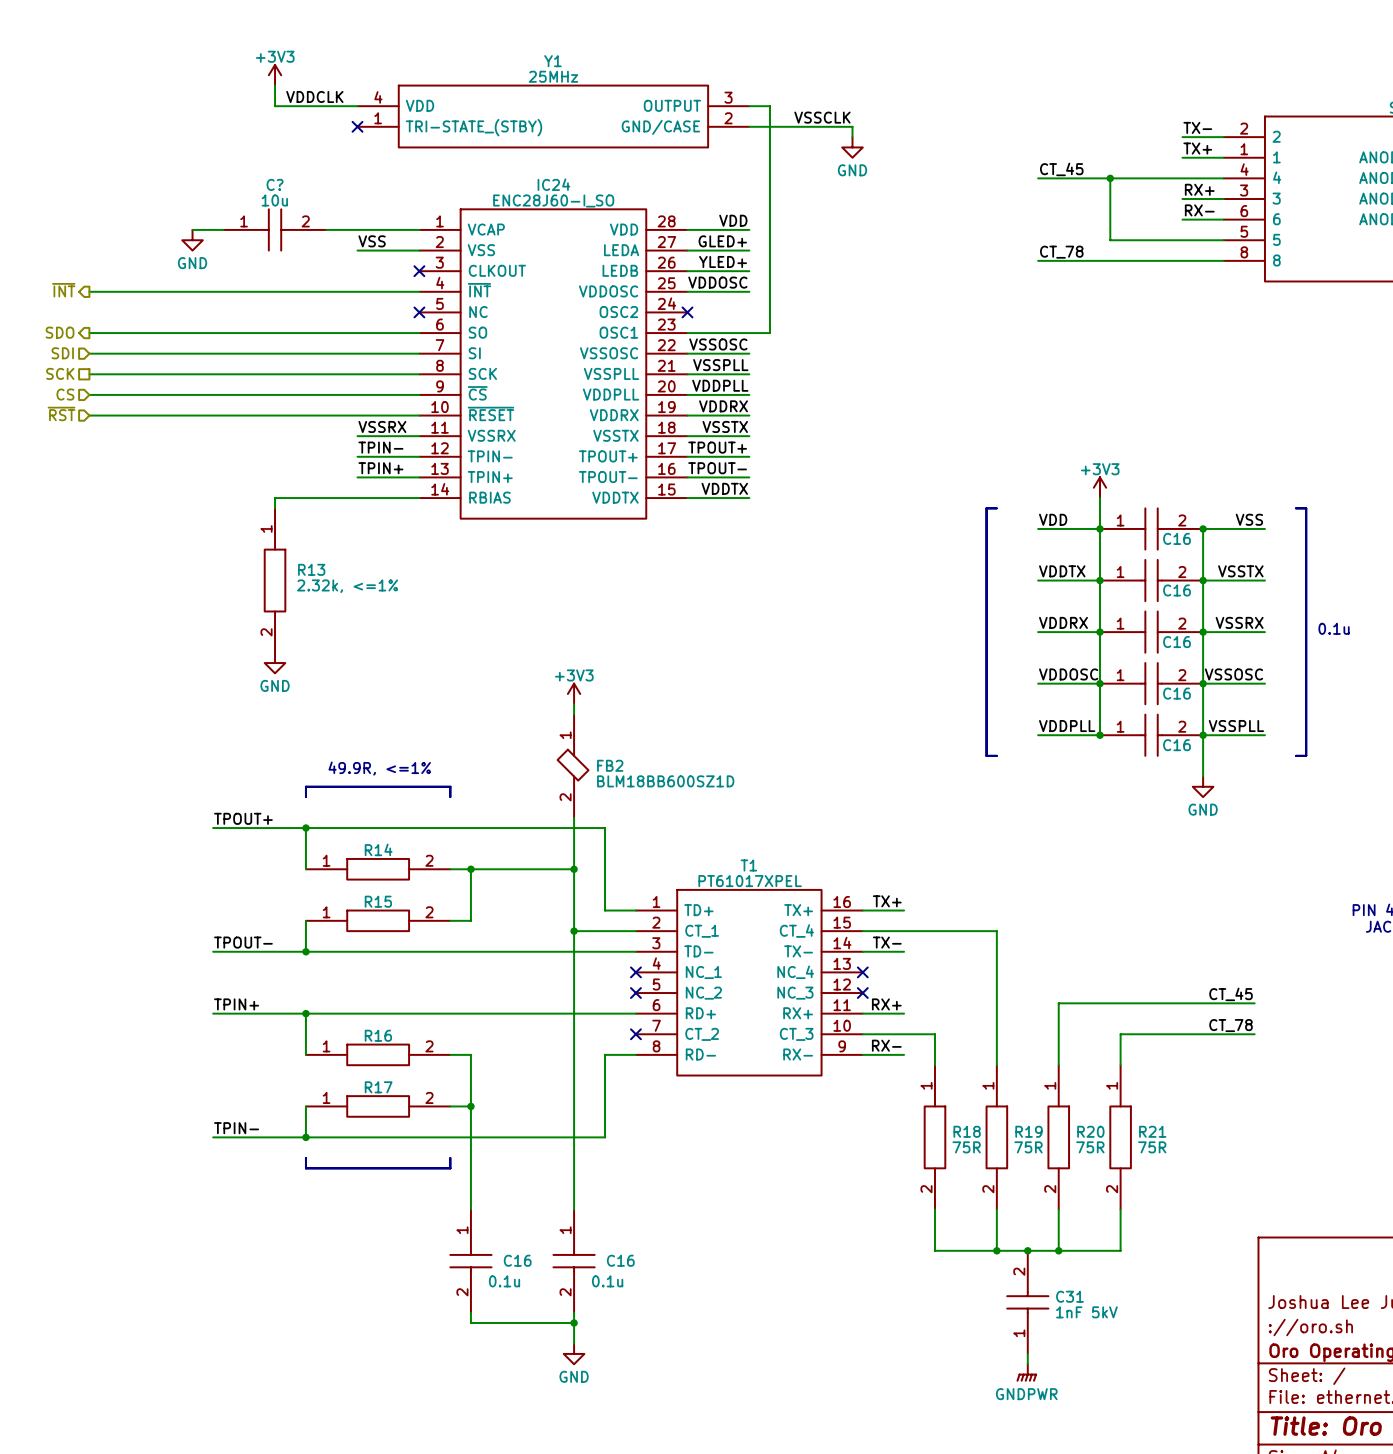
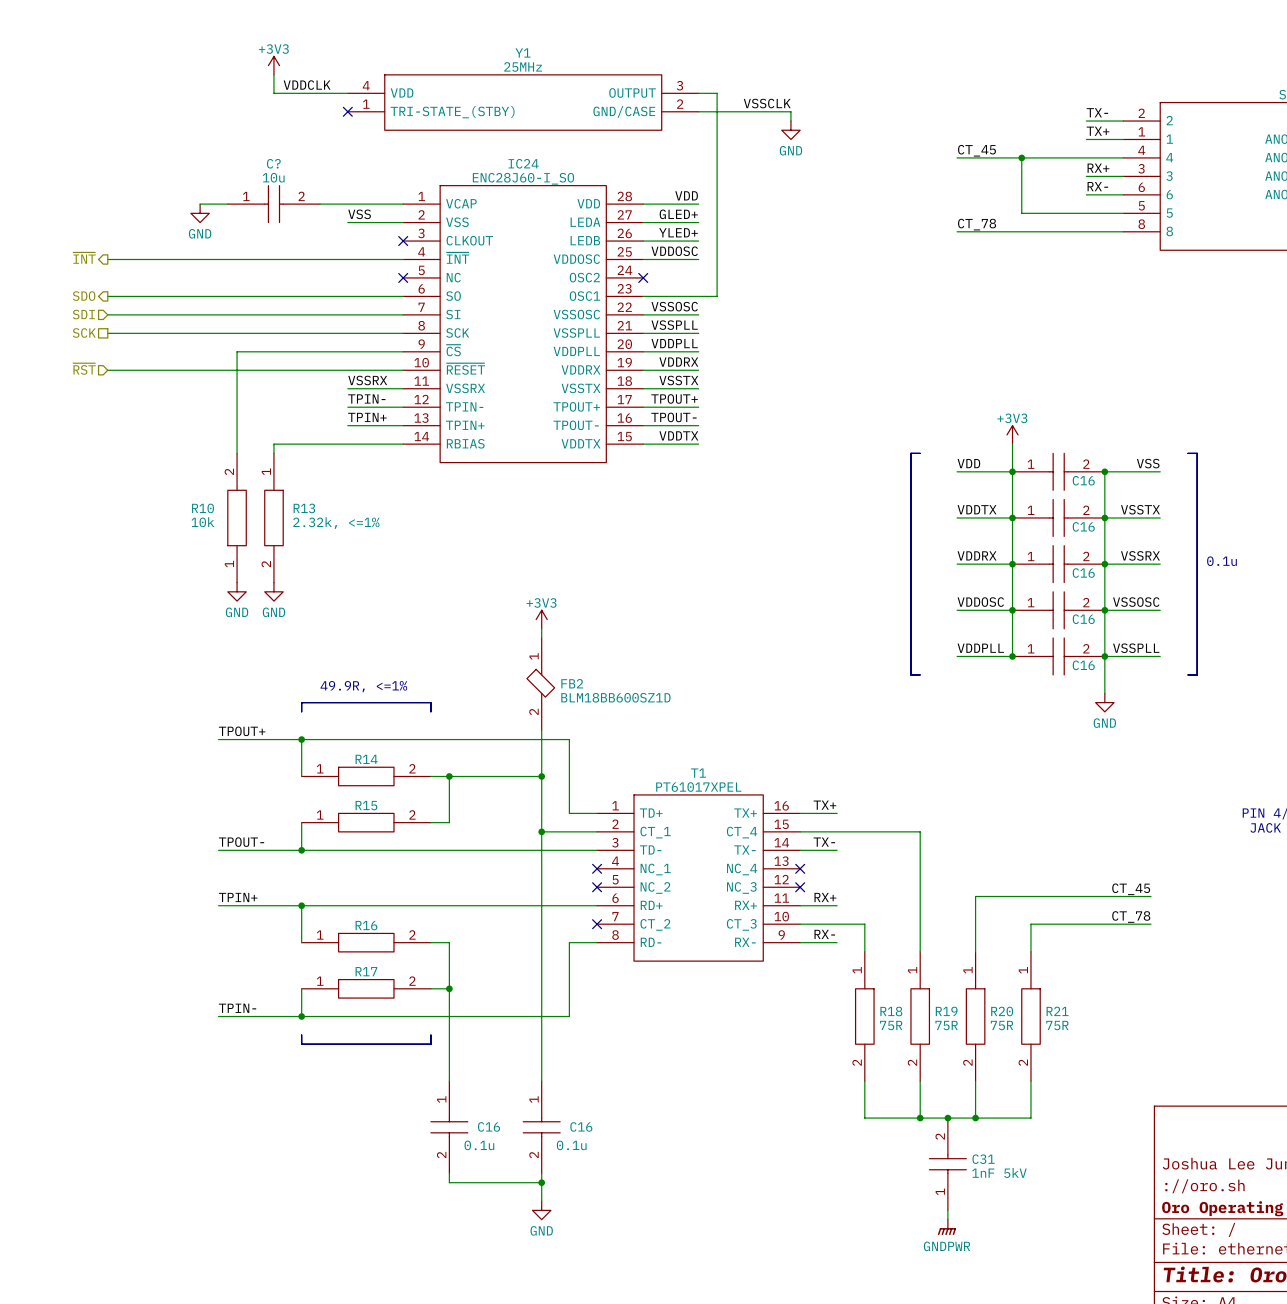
hierarchical label: CS (65, 394) -> none
wire: (89, 394) (233, 394) -> (237, 453) (237, 351)
R10: none -> 10k (237, 517)
power symbol: none -> GND (237, 591)

